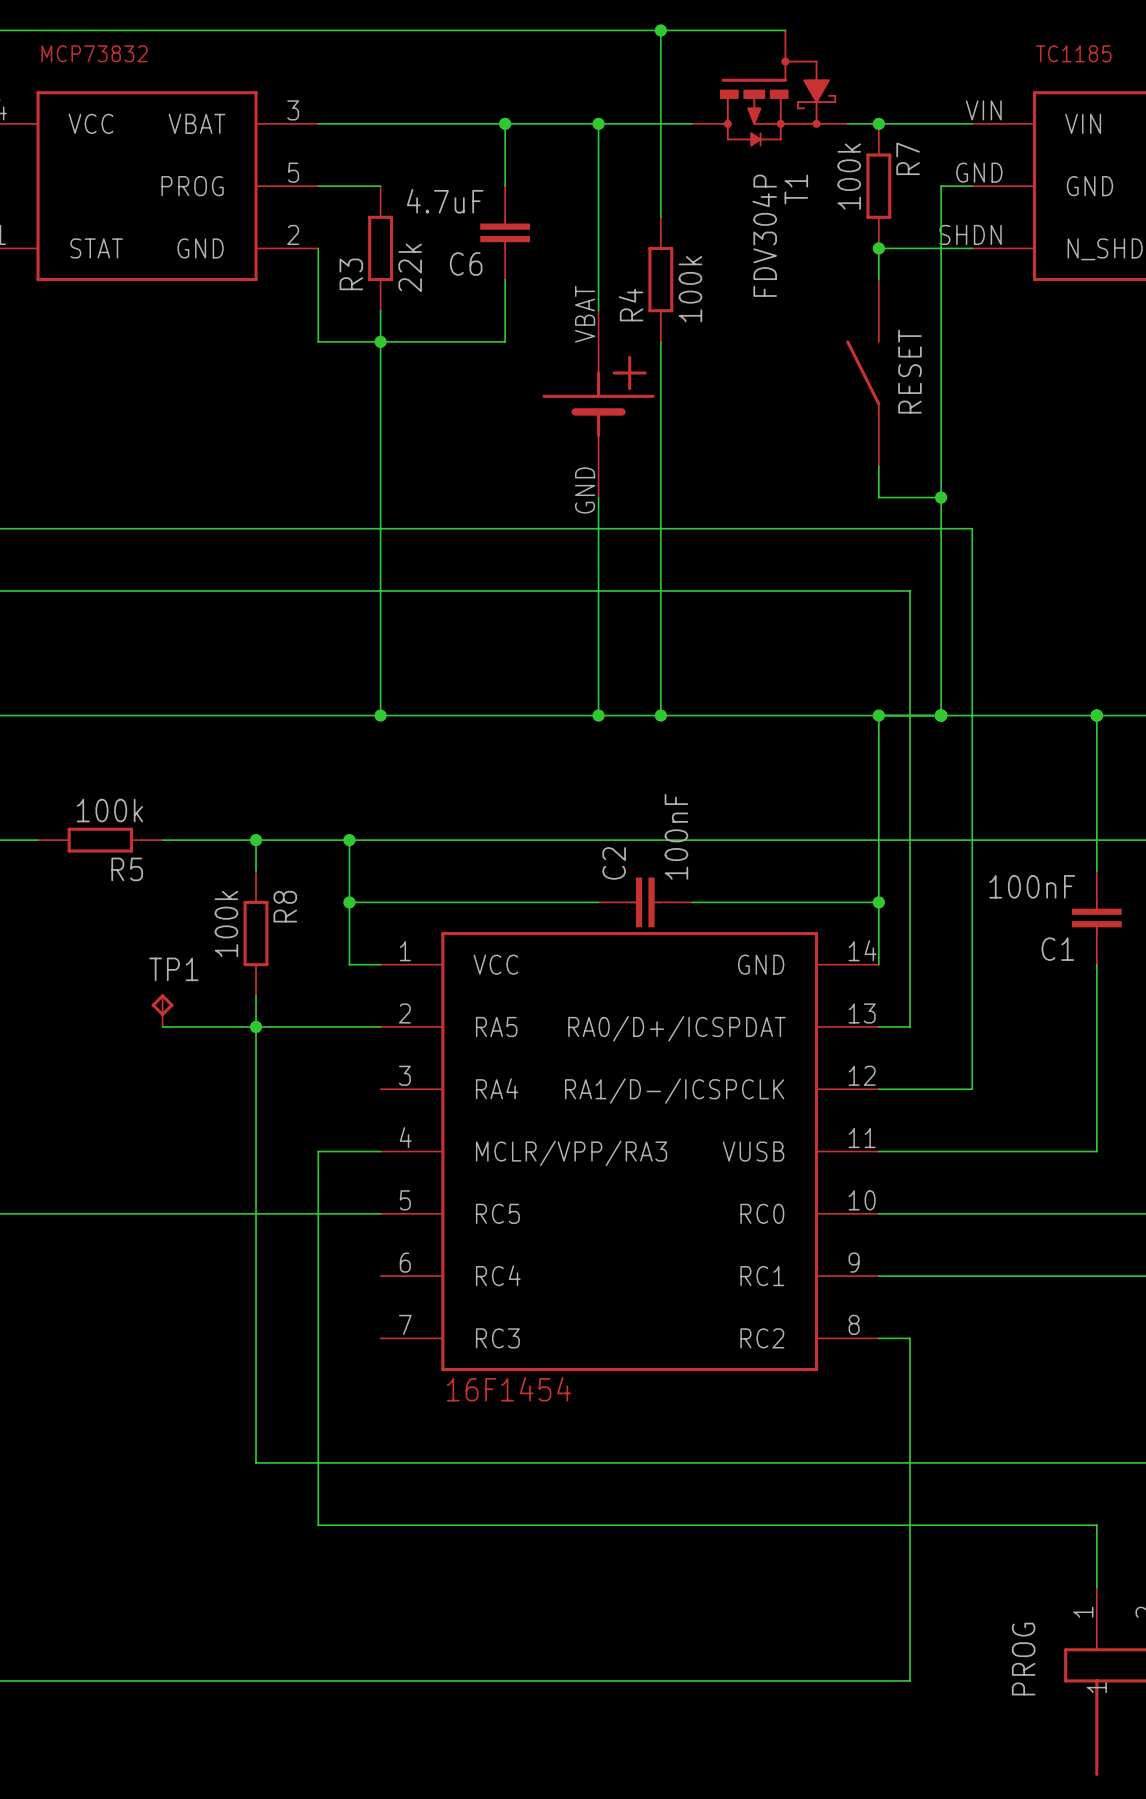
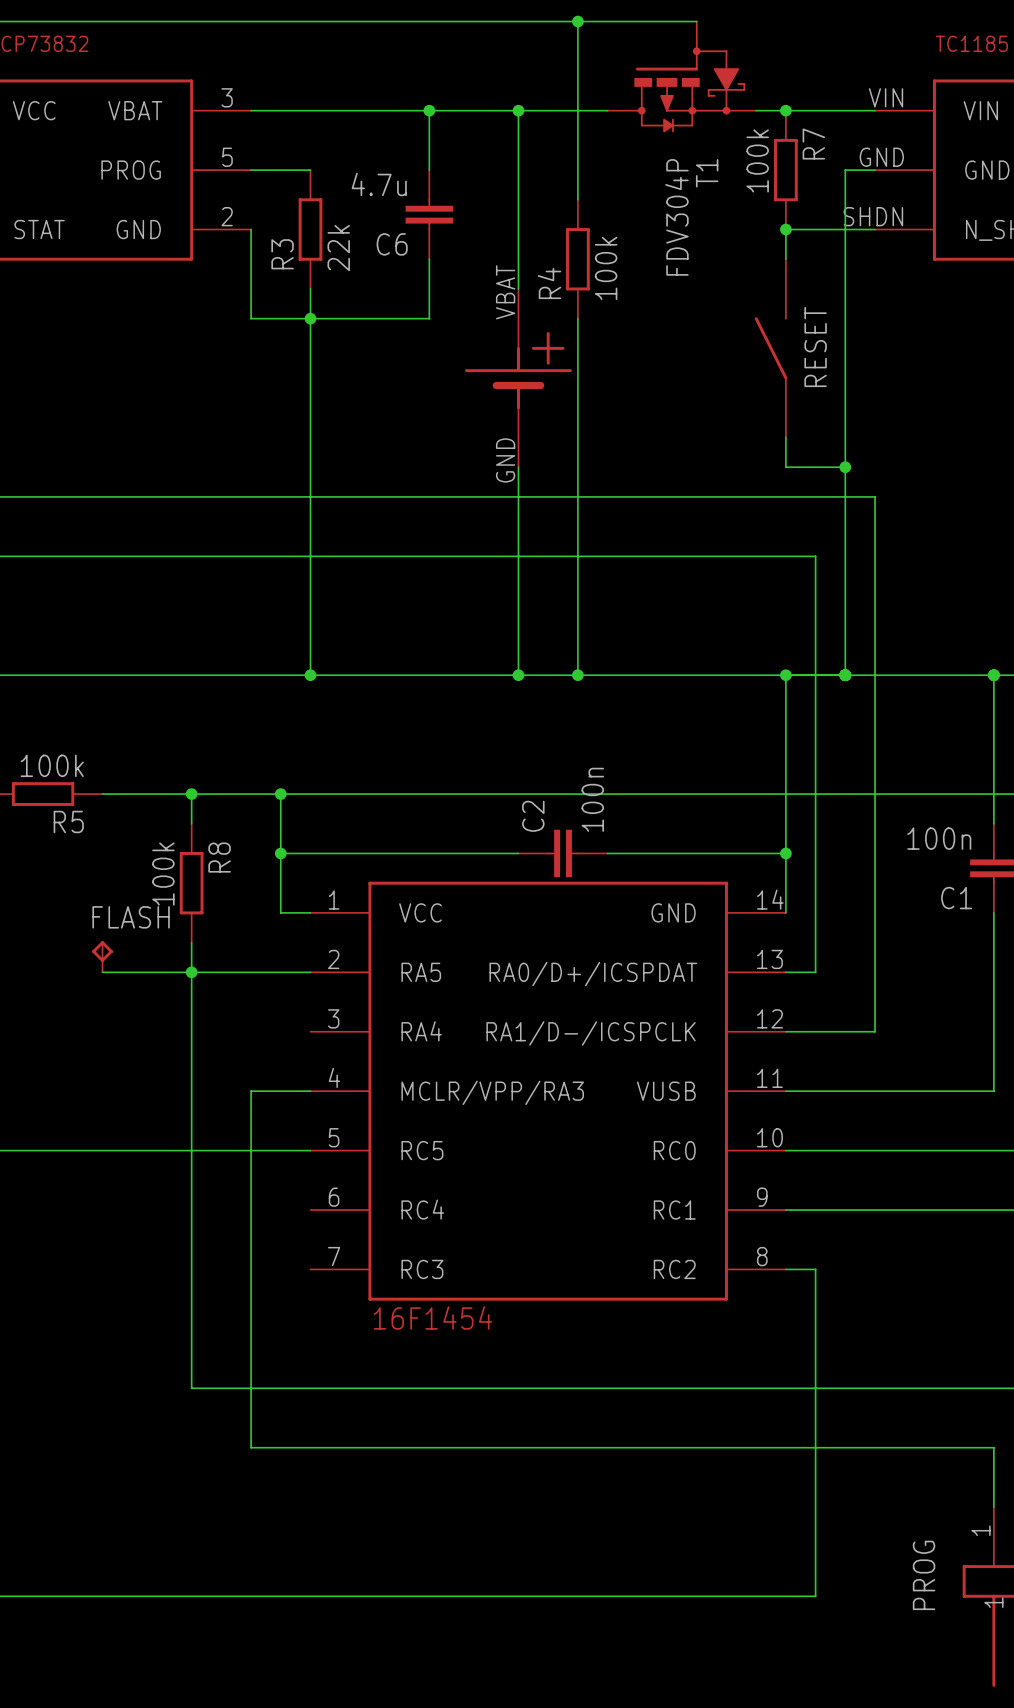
C6 value: 4.7uF (445, 201) -> 4.7u (379, 184)
C2 value: 100nF (676, 836) -> 100n (592, 799)
C1 value: 100nF (1032, 886) -> 100n (939, 838)
TP1 name: TP1 (173, 969) -> FLASH (131, 917)

